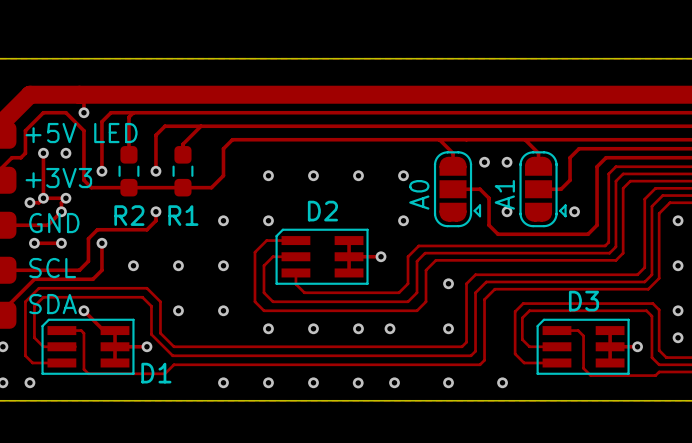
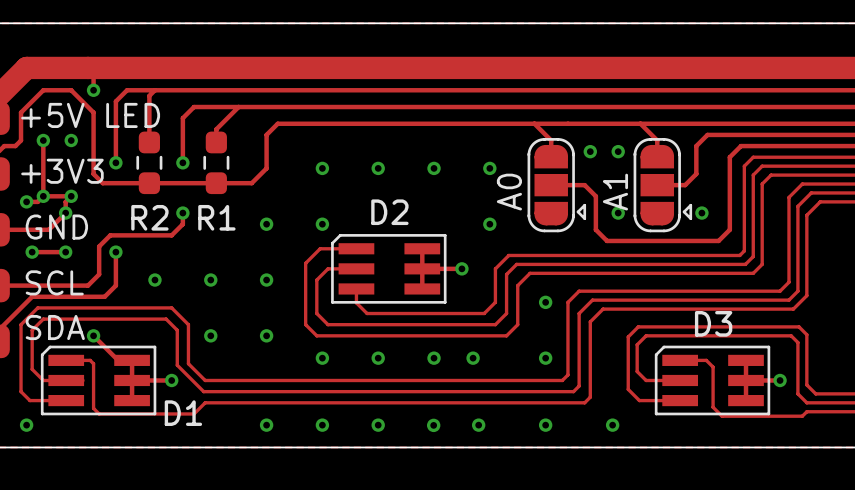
via: (678, 220) -> none
via: (678, 265) -> none
via: (678, 310) -> none
via: (678, 337) -> none

